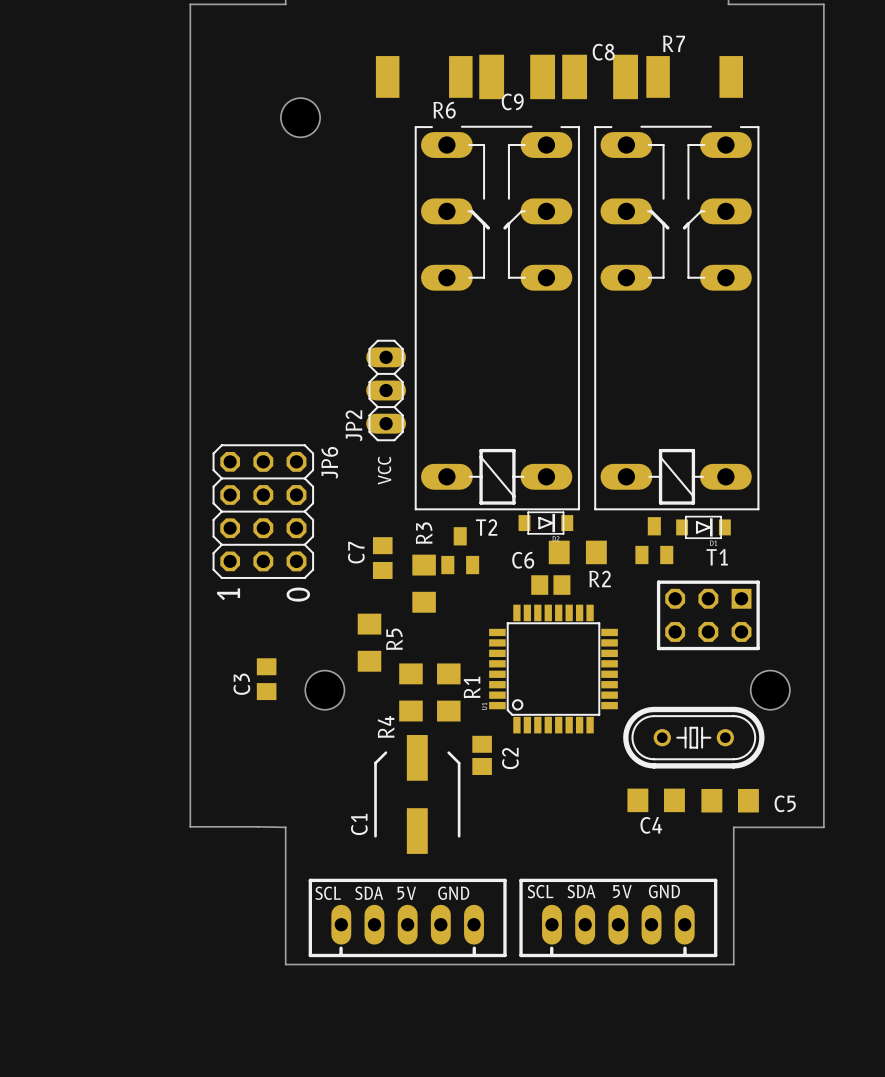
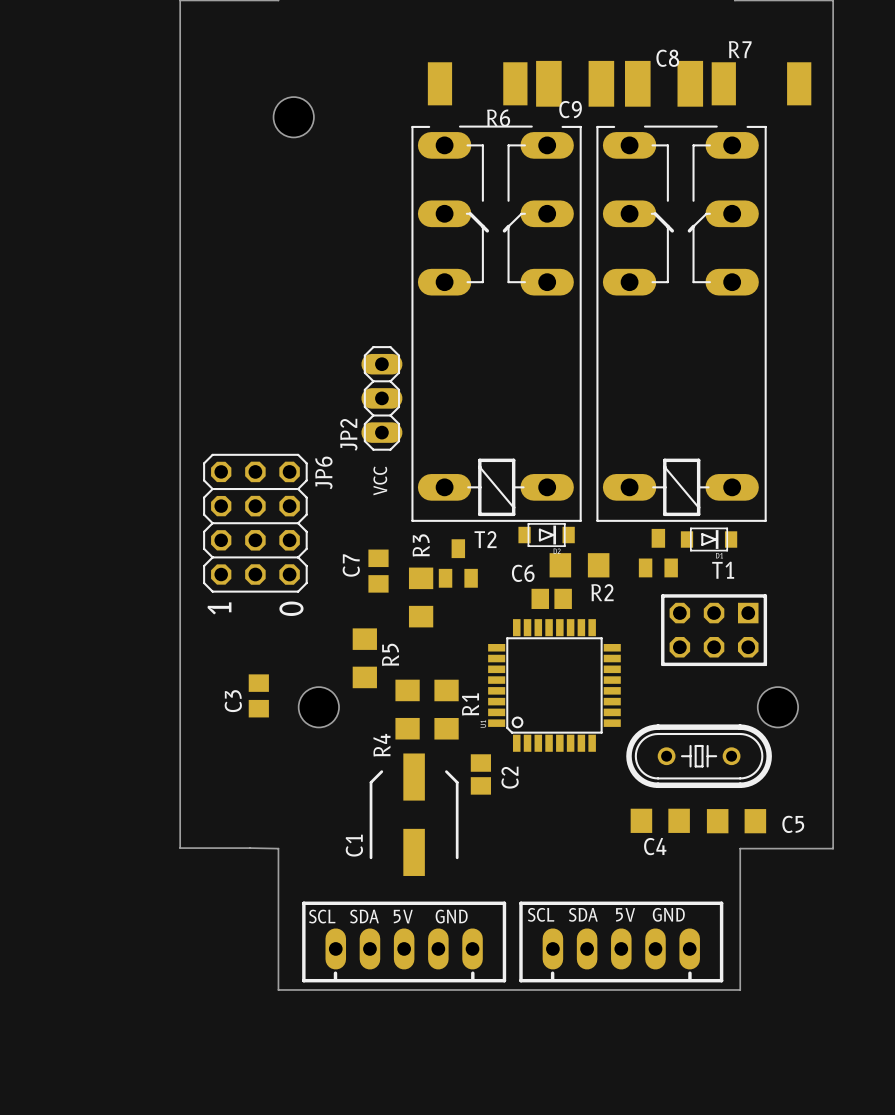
R6 position: (424, 76) -> (477, 83)
C9 position: (517, 76) -> (575, 83)
C8 position: (600, 76) -> (664, 83)
R7 position: (694, 76) -> (761, 83)

